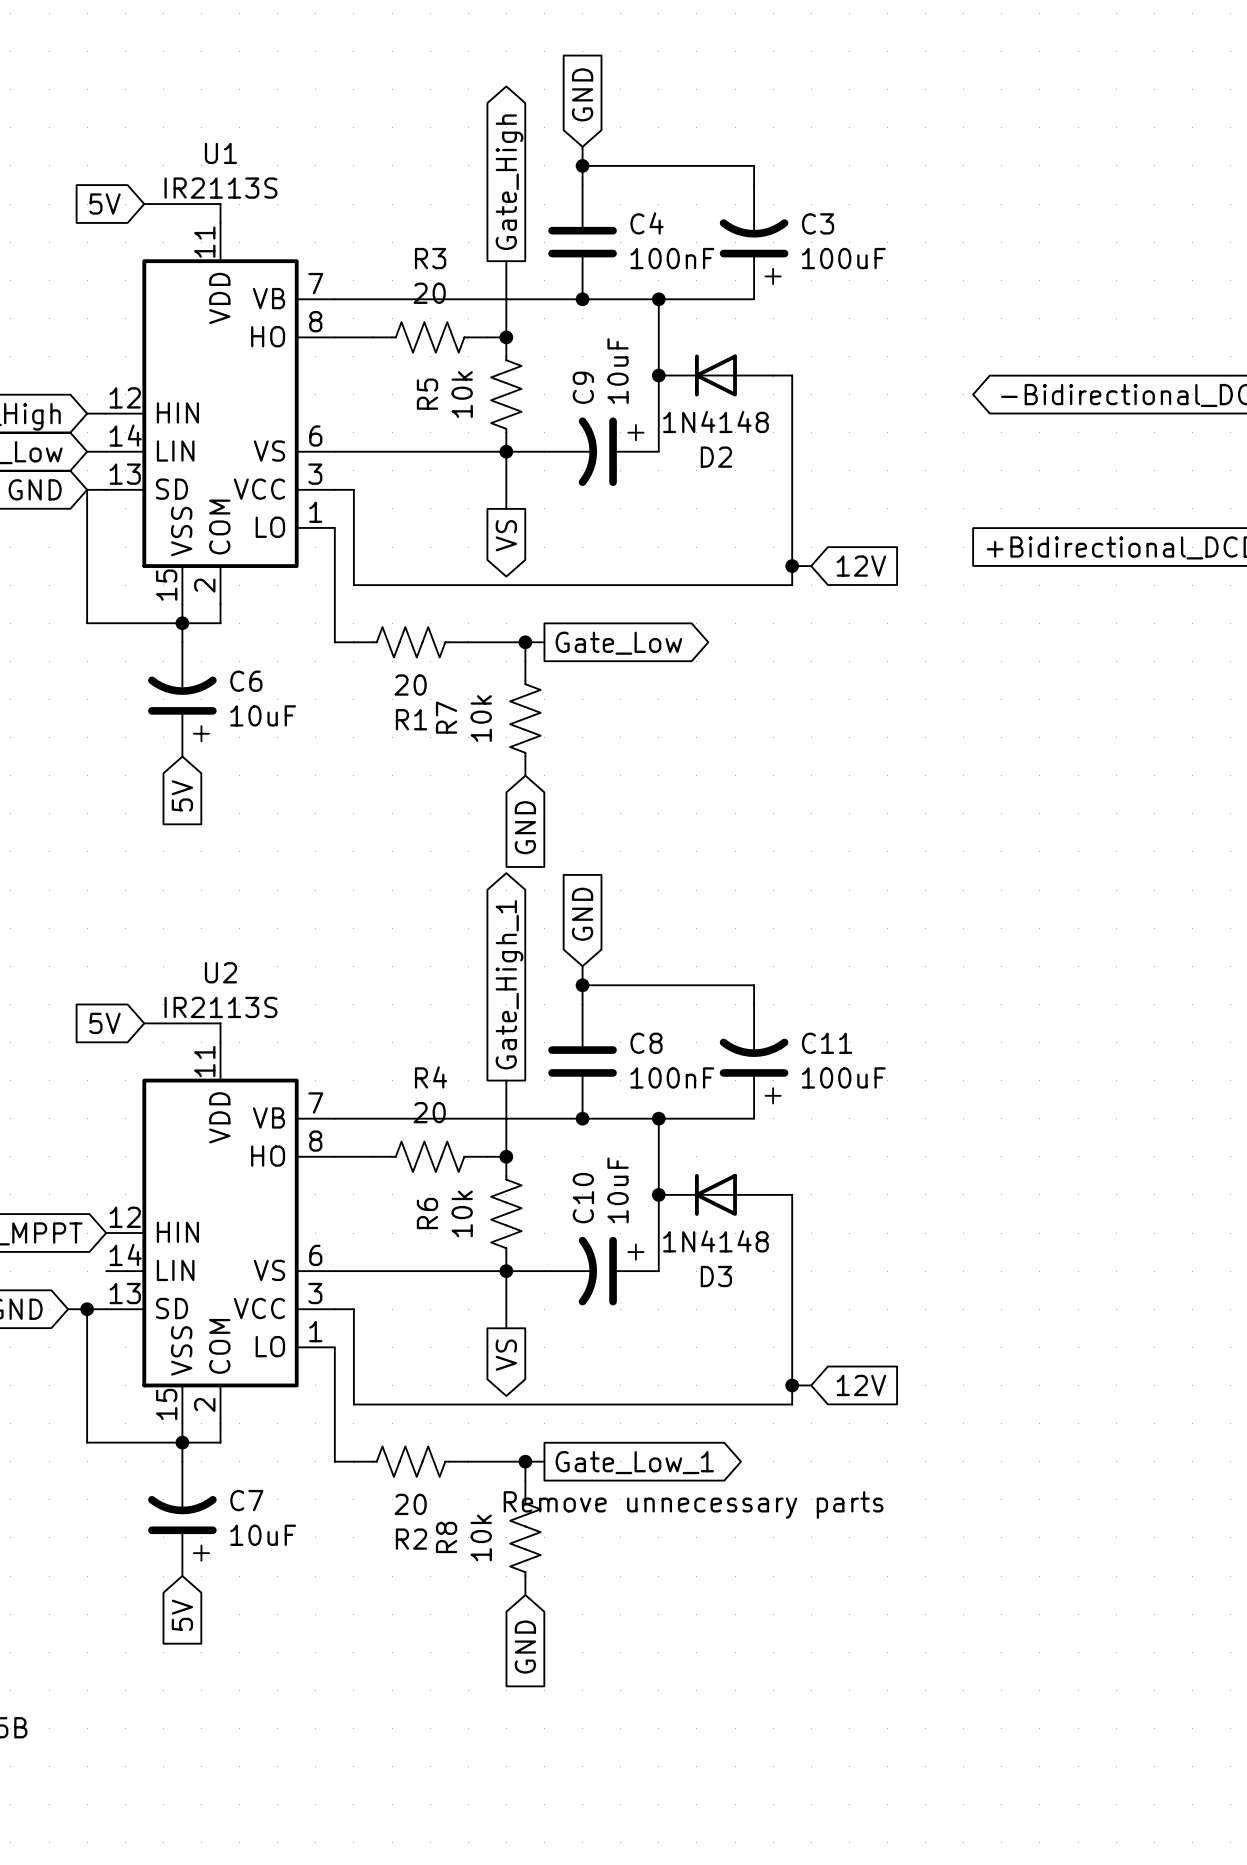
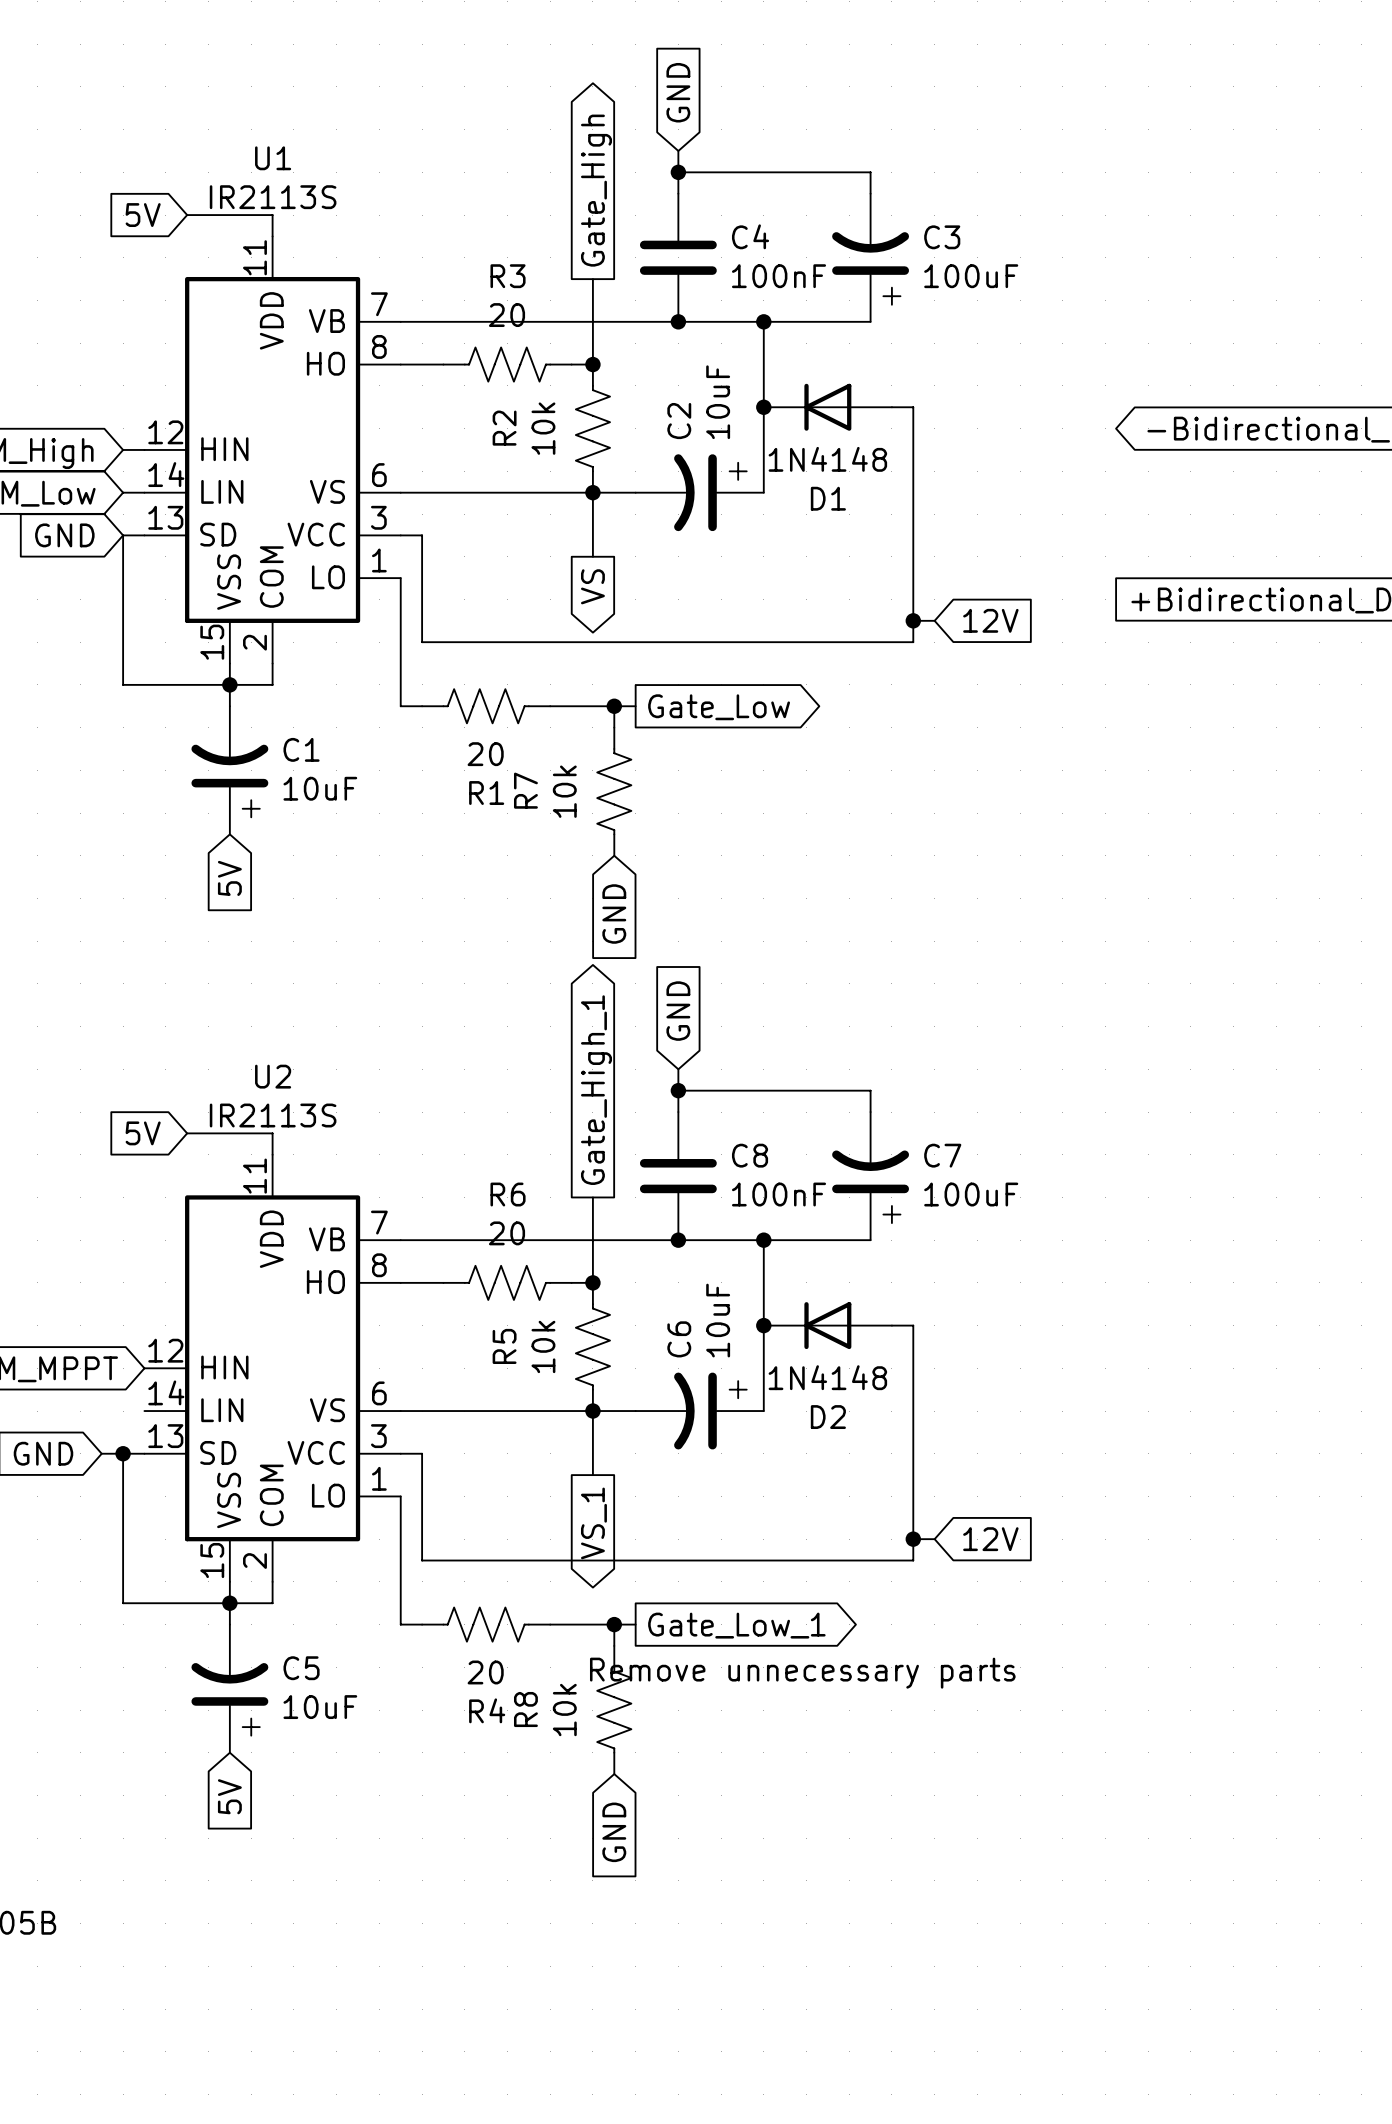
C9 name: C9 (583, 387) -> C2 (679, 421)
R5 name: R5 (427, 394) -> R2 (504, 428)
D2 name: D2 (716, 457) -> D1 (828, 498)
C6 name: C6 (246, 681) -> C1 (301, 749)
C11 name: C11 (827, 1043) -> C7 (942, 1155)
R4 name: R4 (431, 1077) -> R6 (508, 1194)
C10 name: C10 (583, 1198) -> C6 (679, 1339)
R6 name: R6 (427, 1213) -> R5 (504, 1346)
D3 name: D3 (716, 1276) -> D2 (828, 1417)
global label: VS (506, 1355) -> VS_1 (593, 1523)
C7 name: C7 (246, 1500) -> C5 (301, 1668)
R2 name: R2 (411, 1539) -> R4 (487, 1710)

